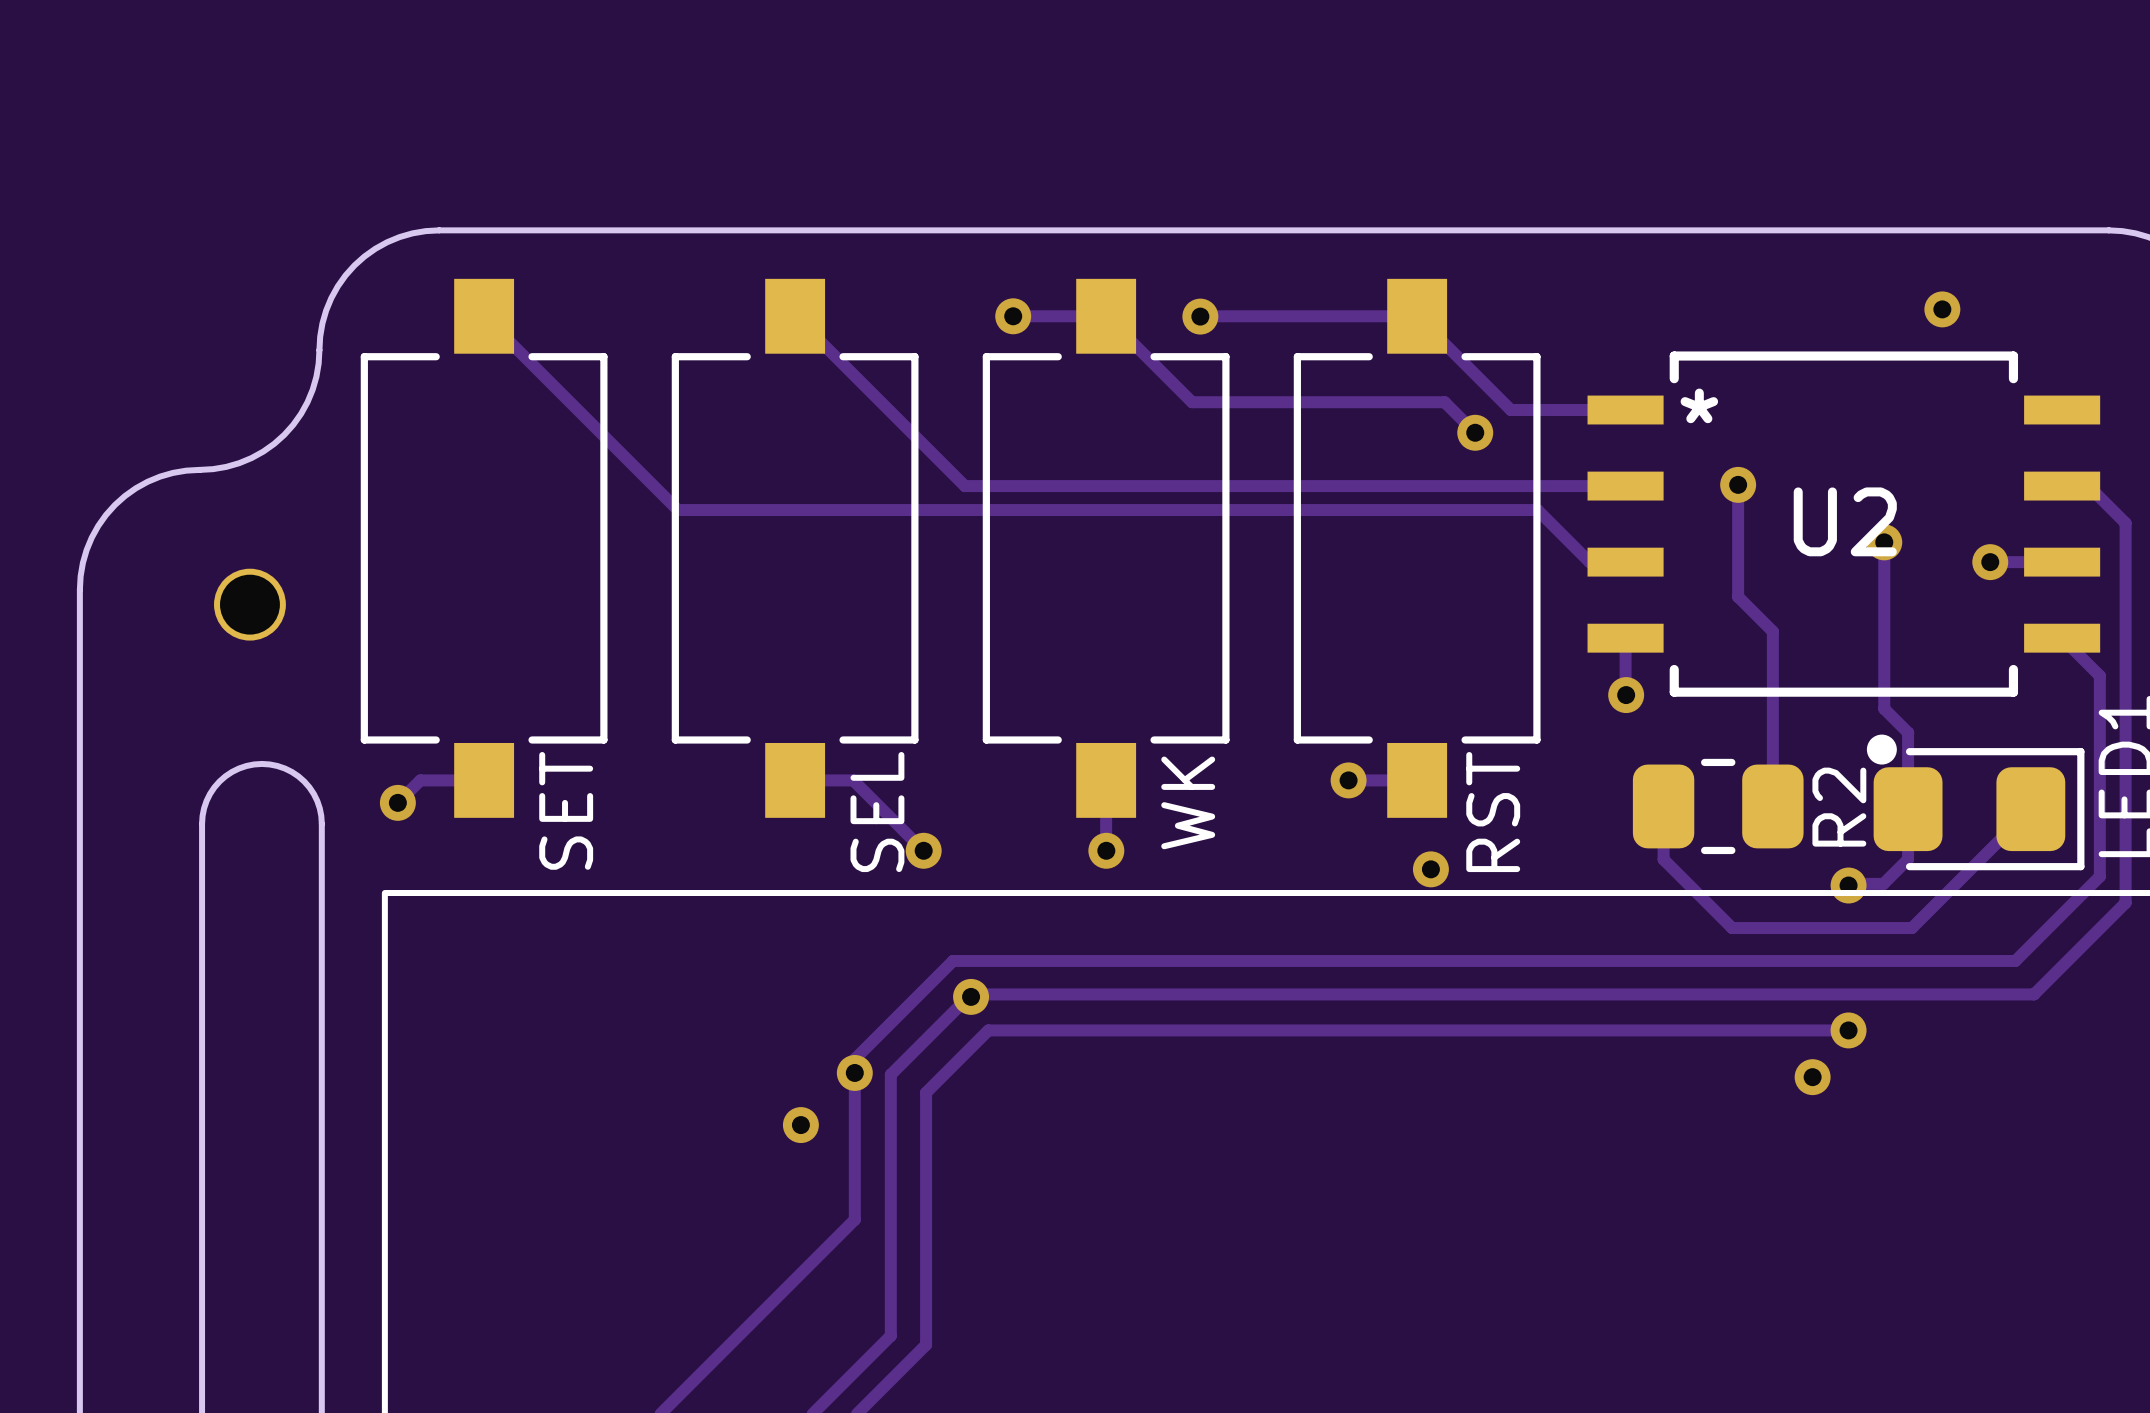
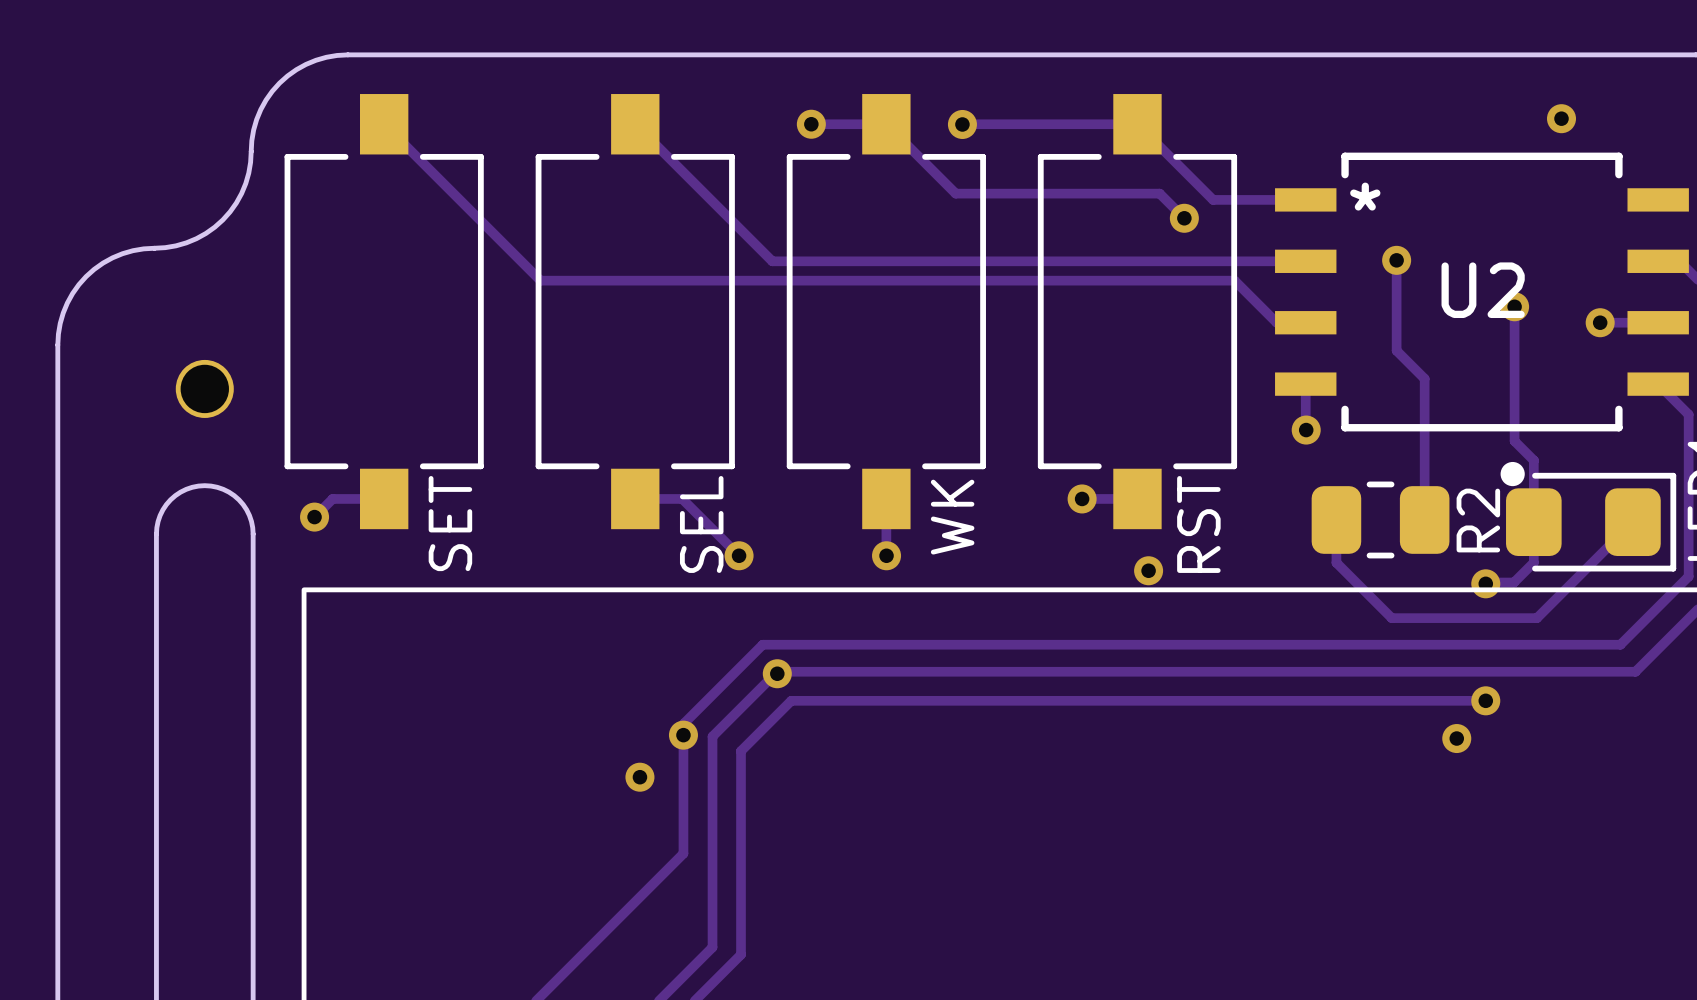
part position: (249, 604) -> (204, 388)

